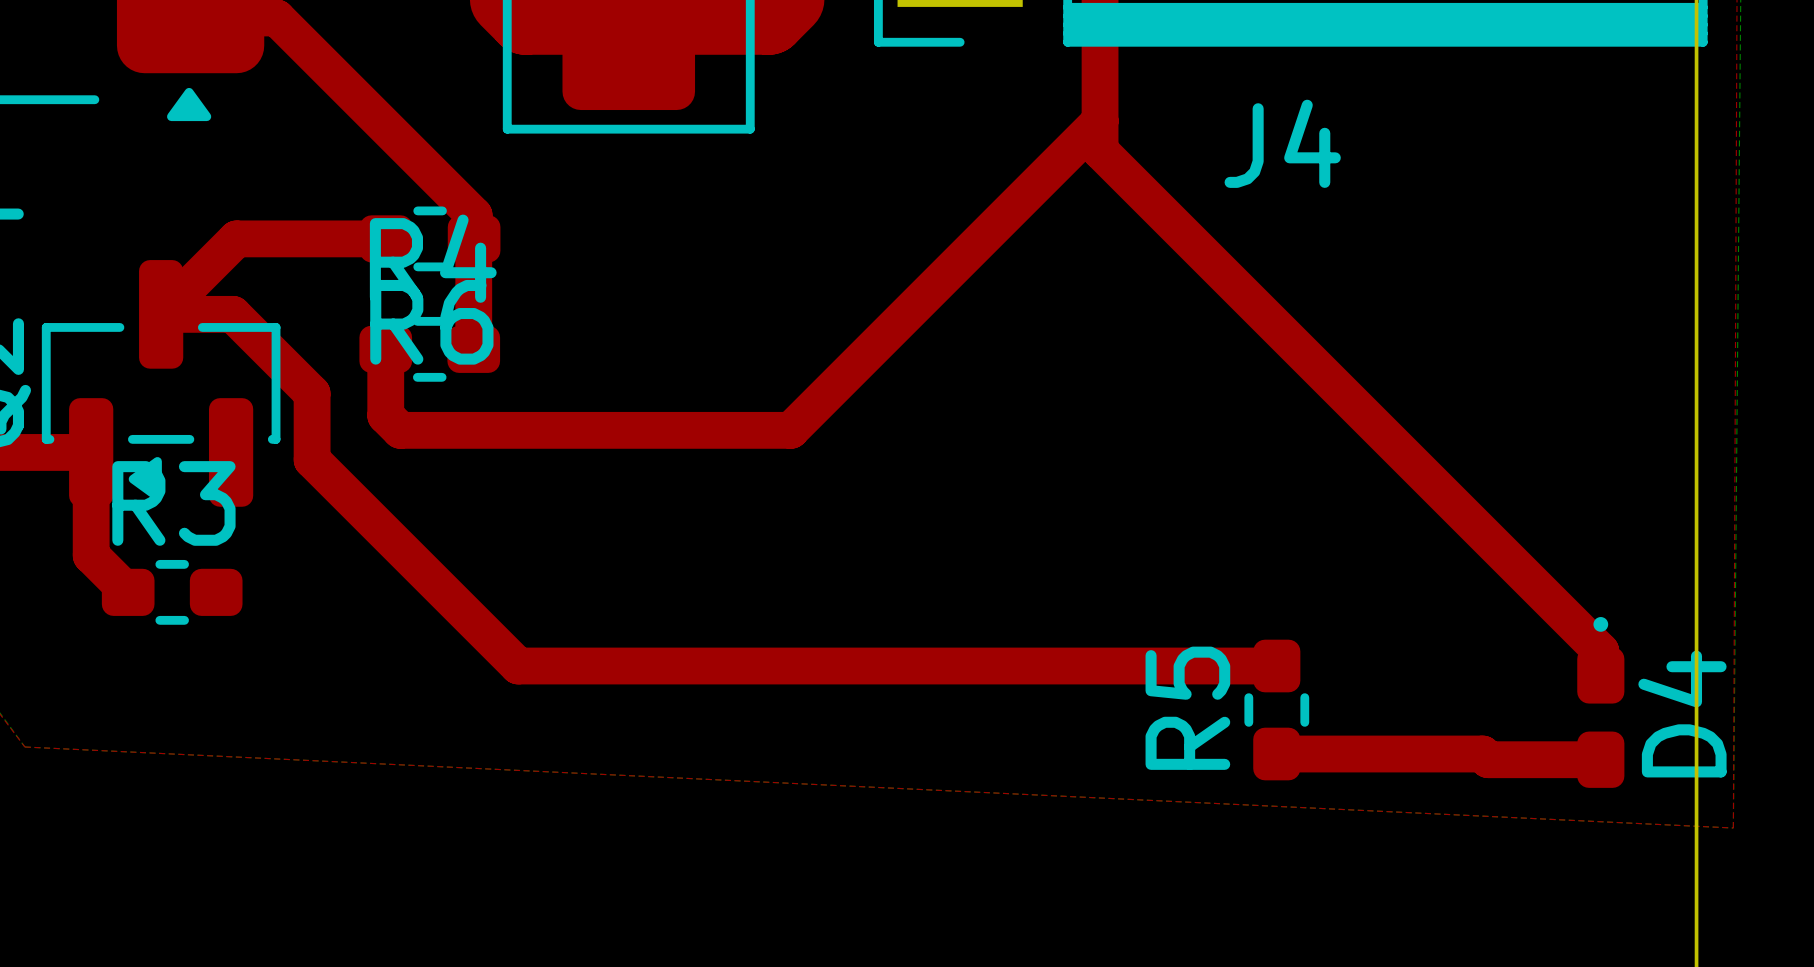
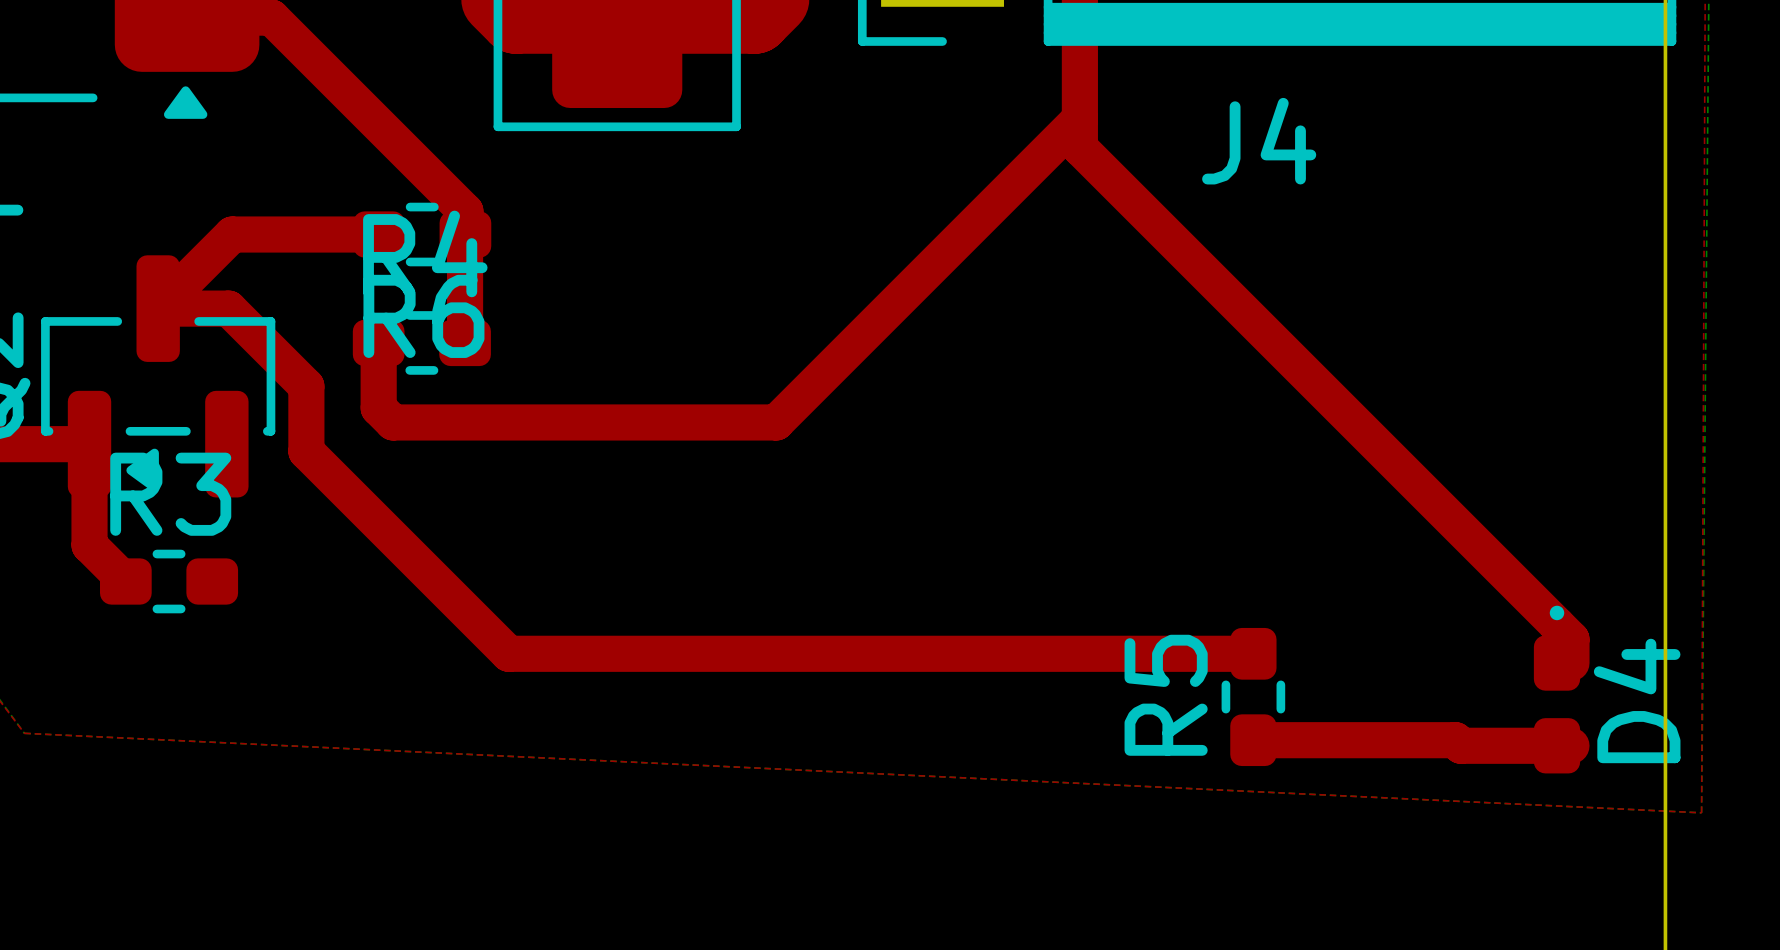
D4 position: (1600, 702) -> (1557, 689)

